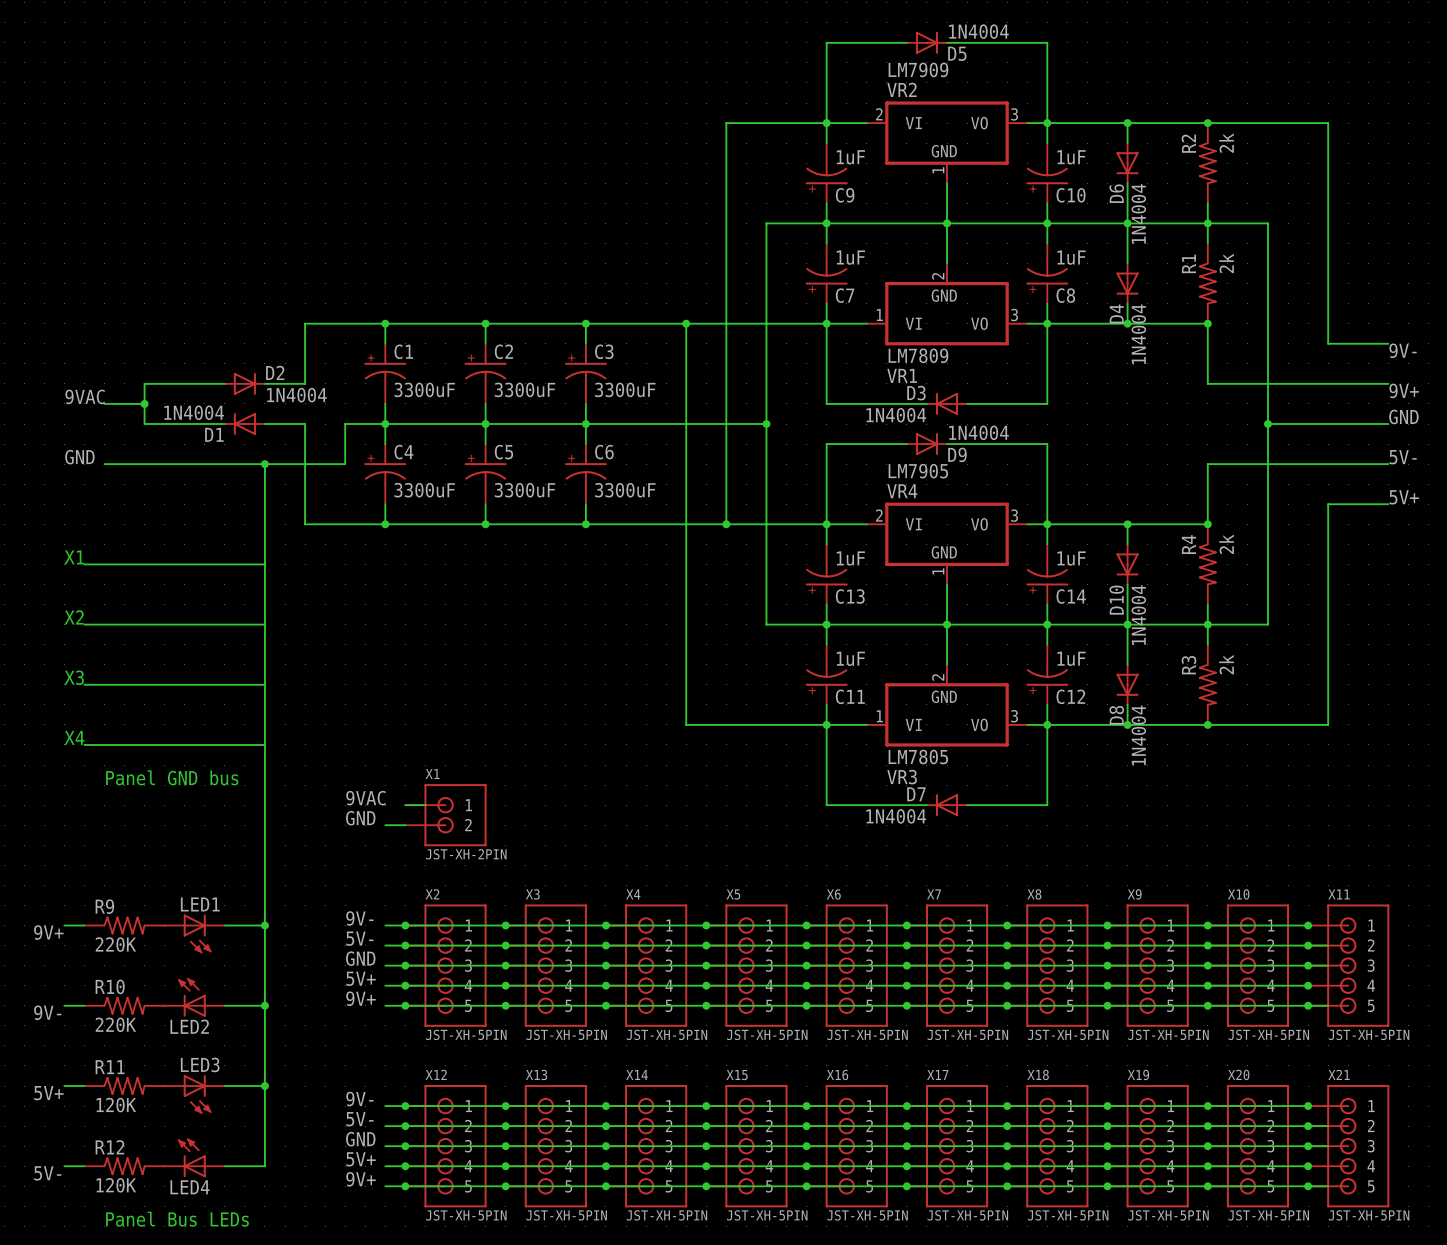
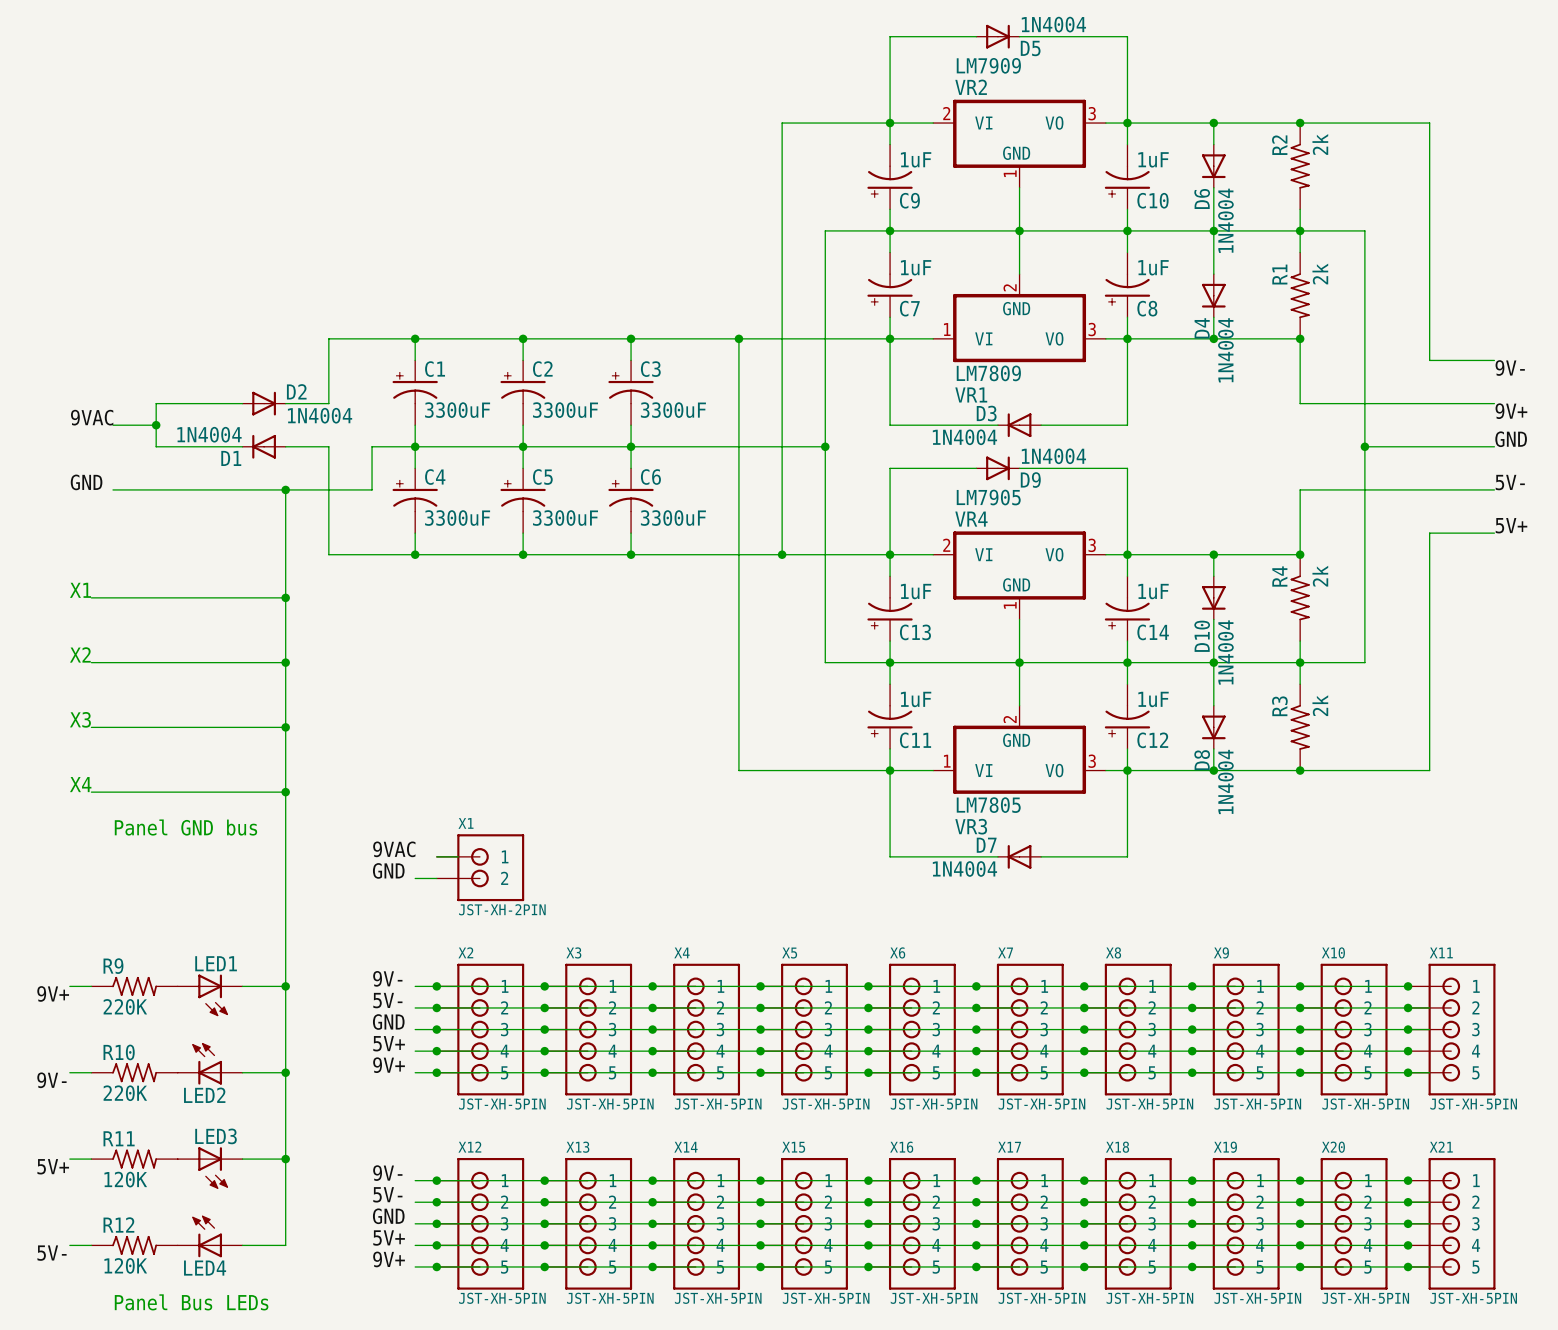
junction: none -> (285, 597)
junction: none -> (285, 662)
junction: none -> (285, 727)
junction: none -> (285, 792)

